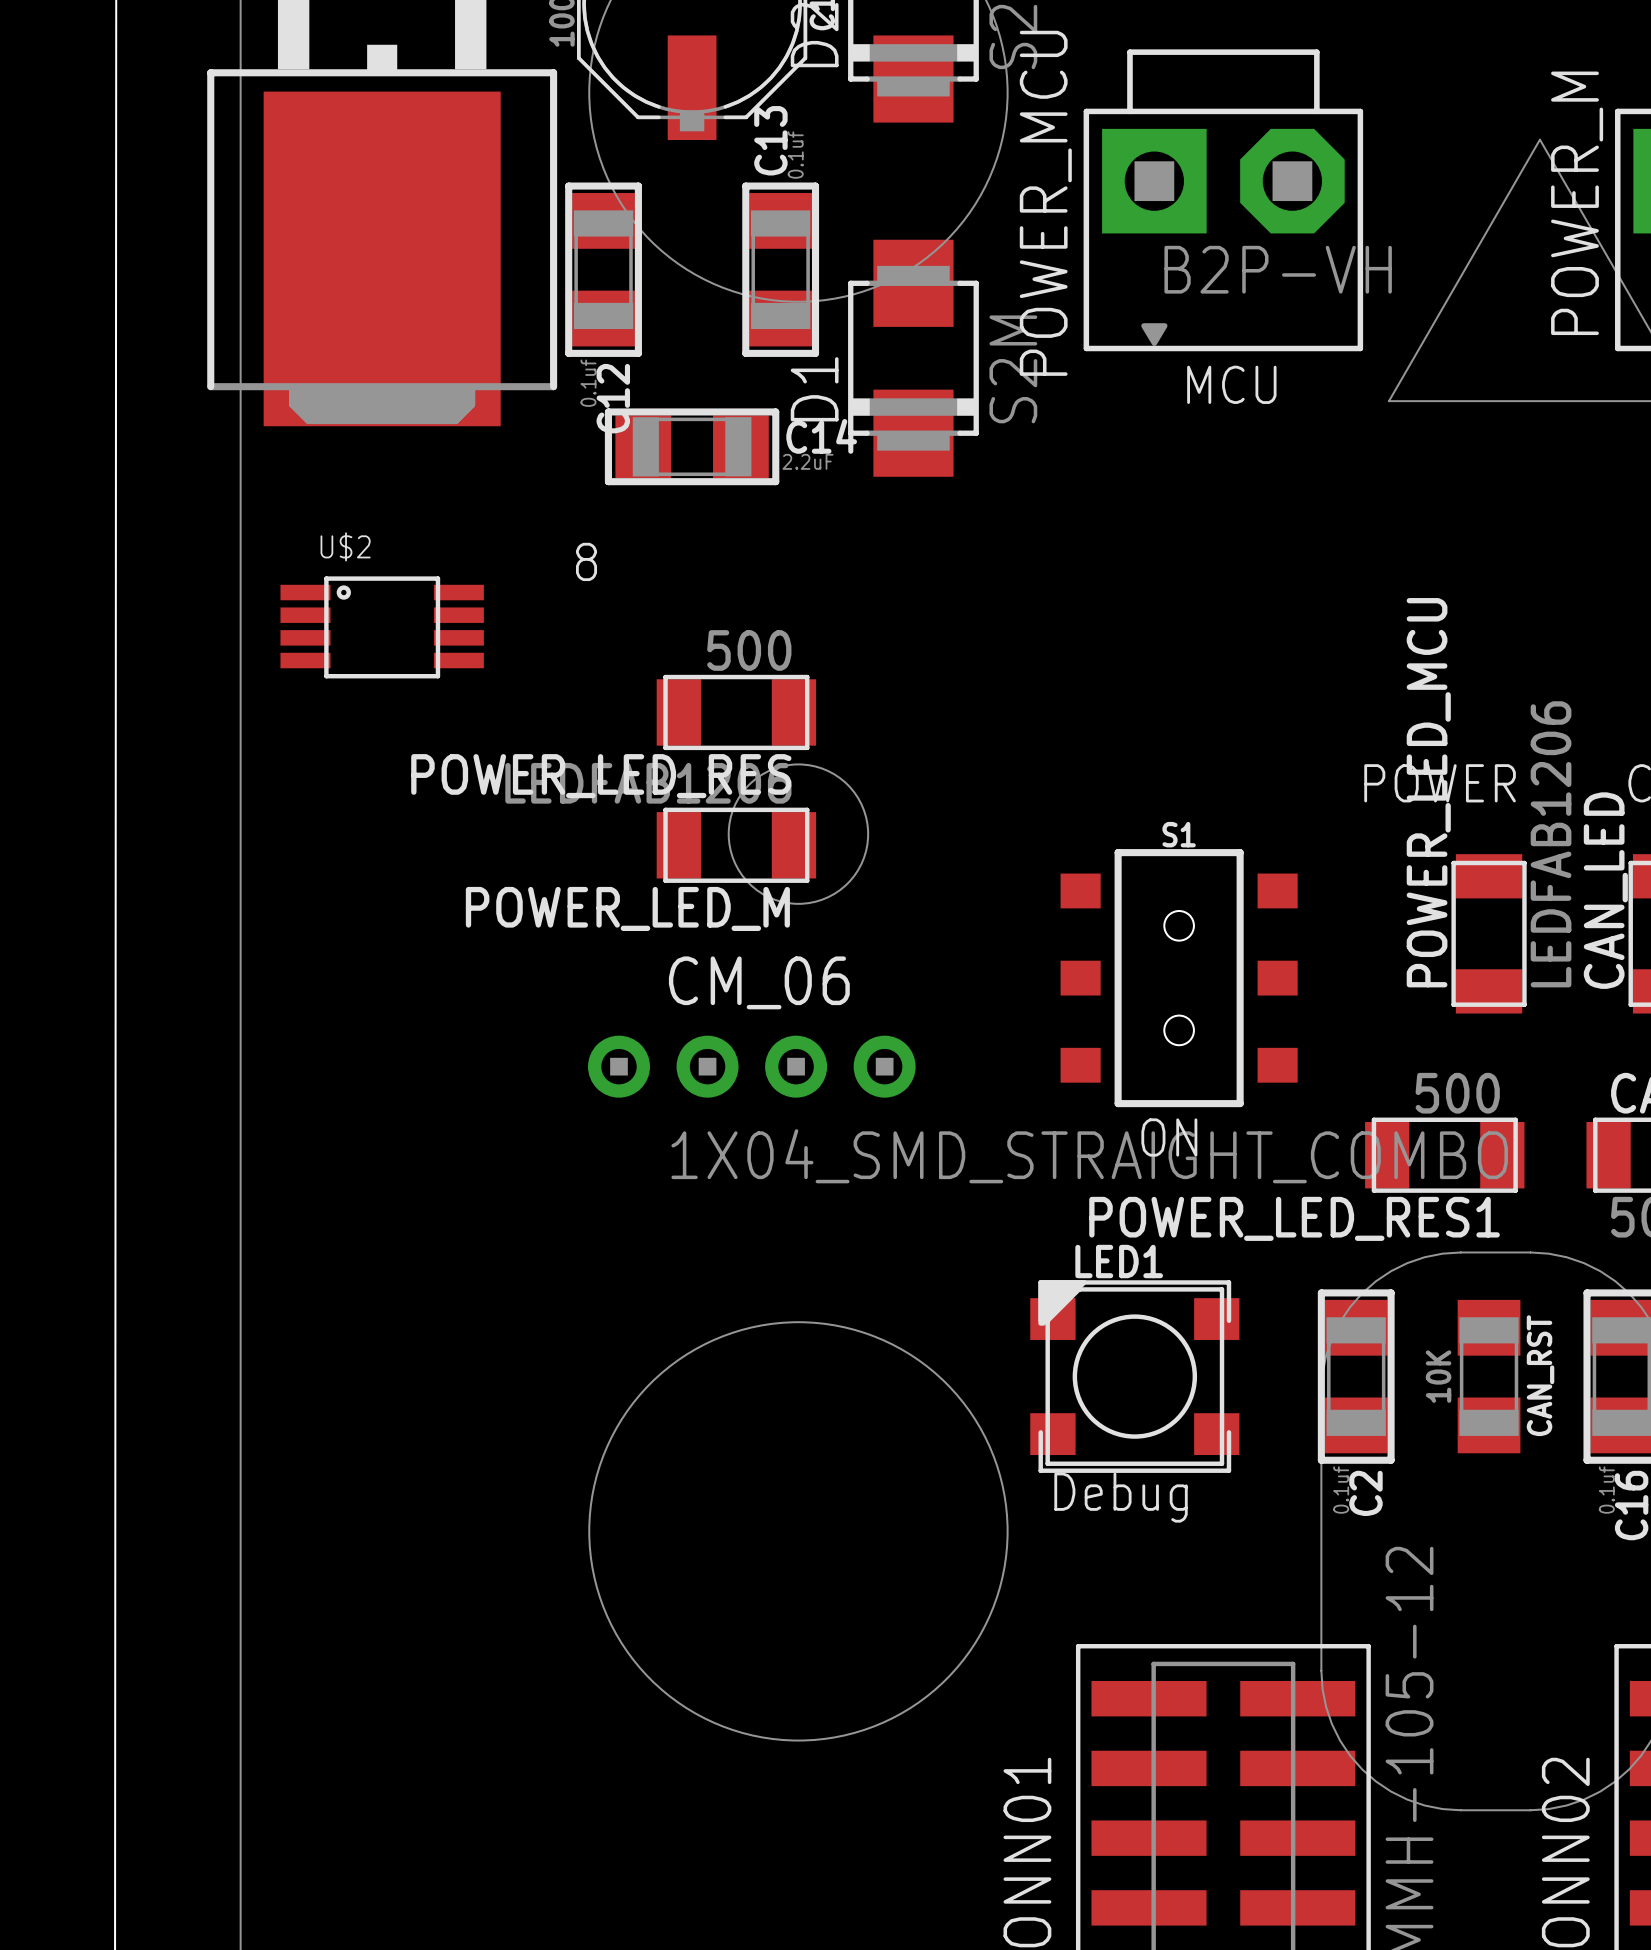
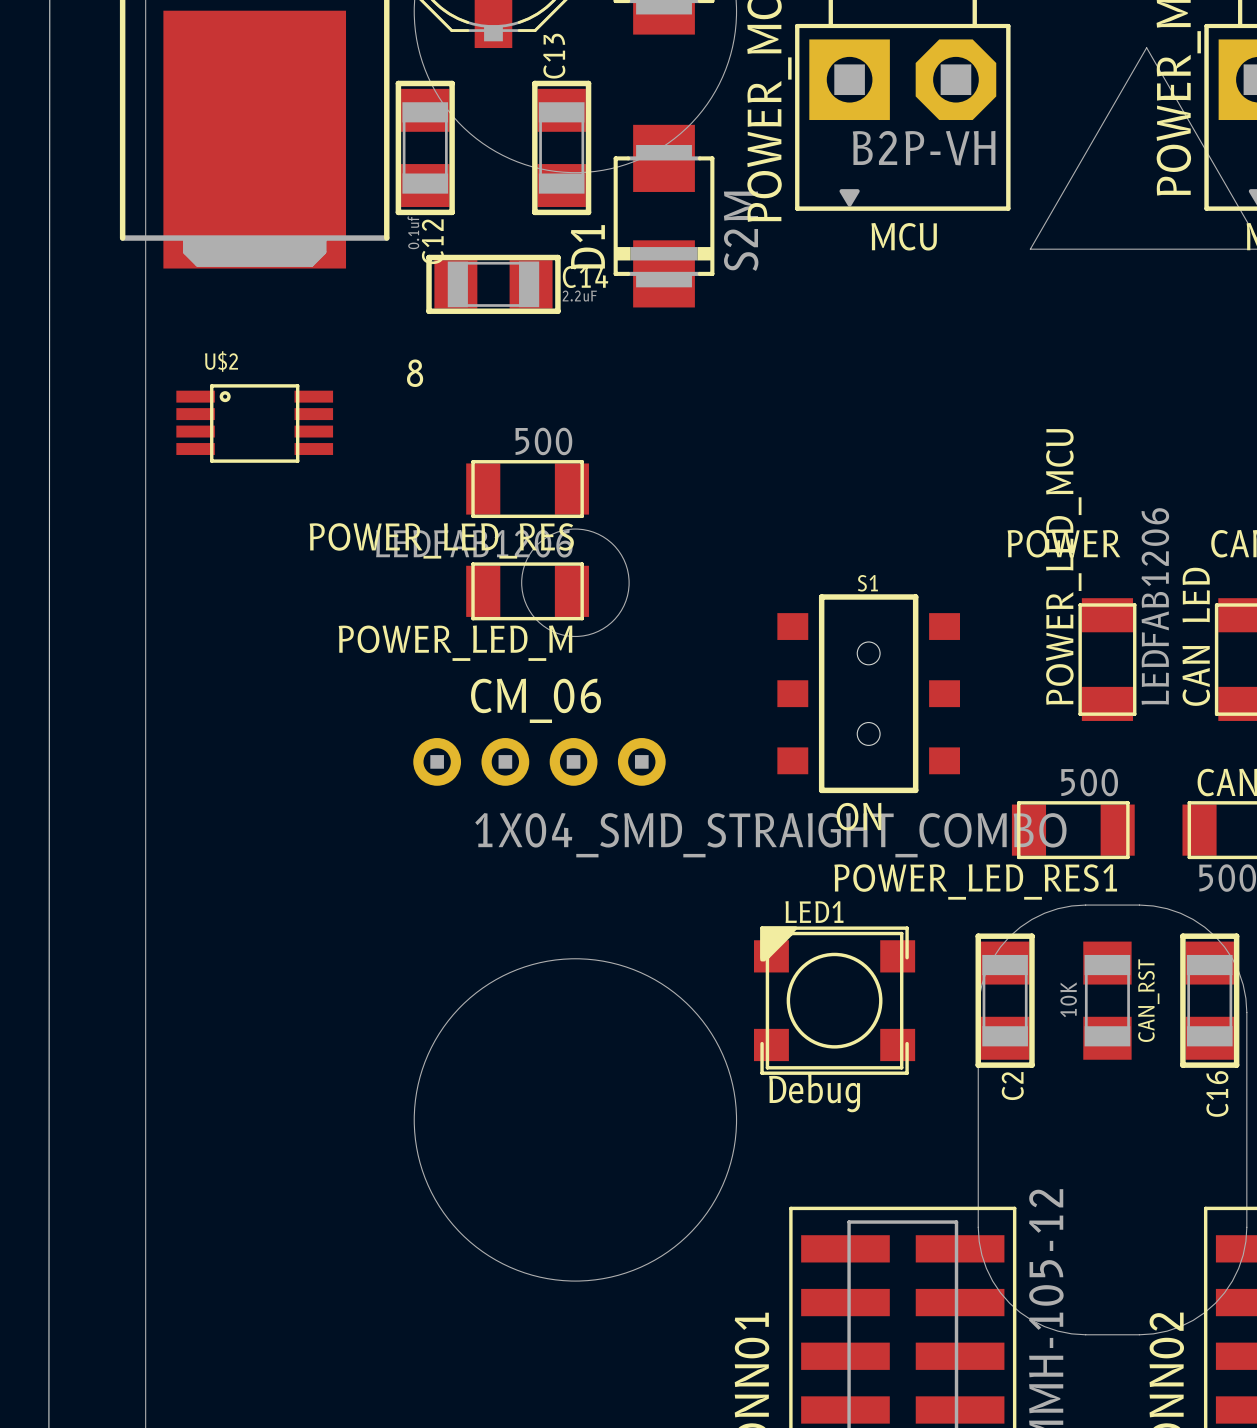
C13 value: 0.1uf (795, 155) -> none
C2 value: 0.1uf (1341, 1490) -> none
C16 value: 0.1uf (1606, 1490) -> none

